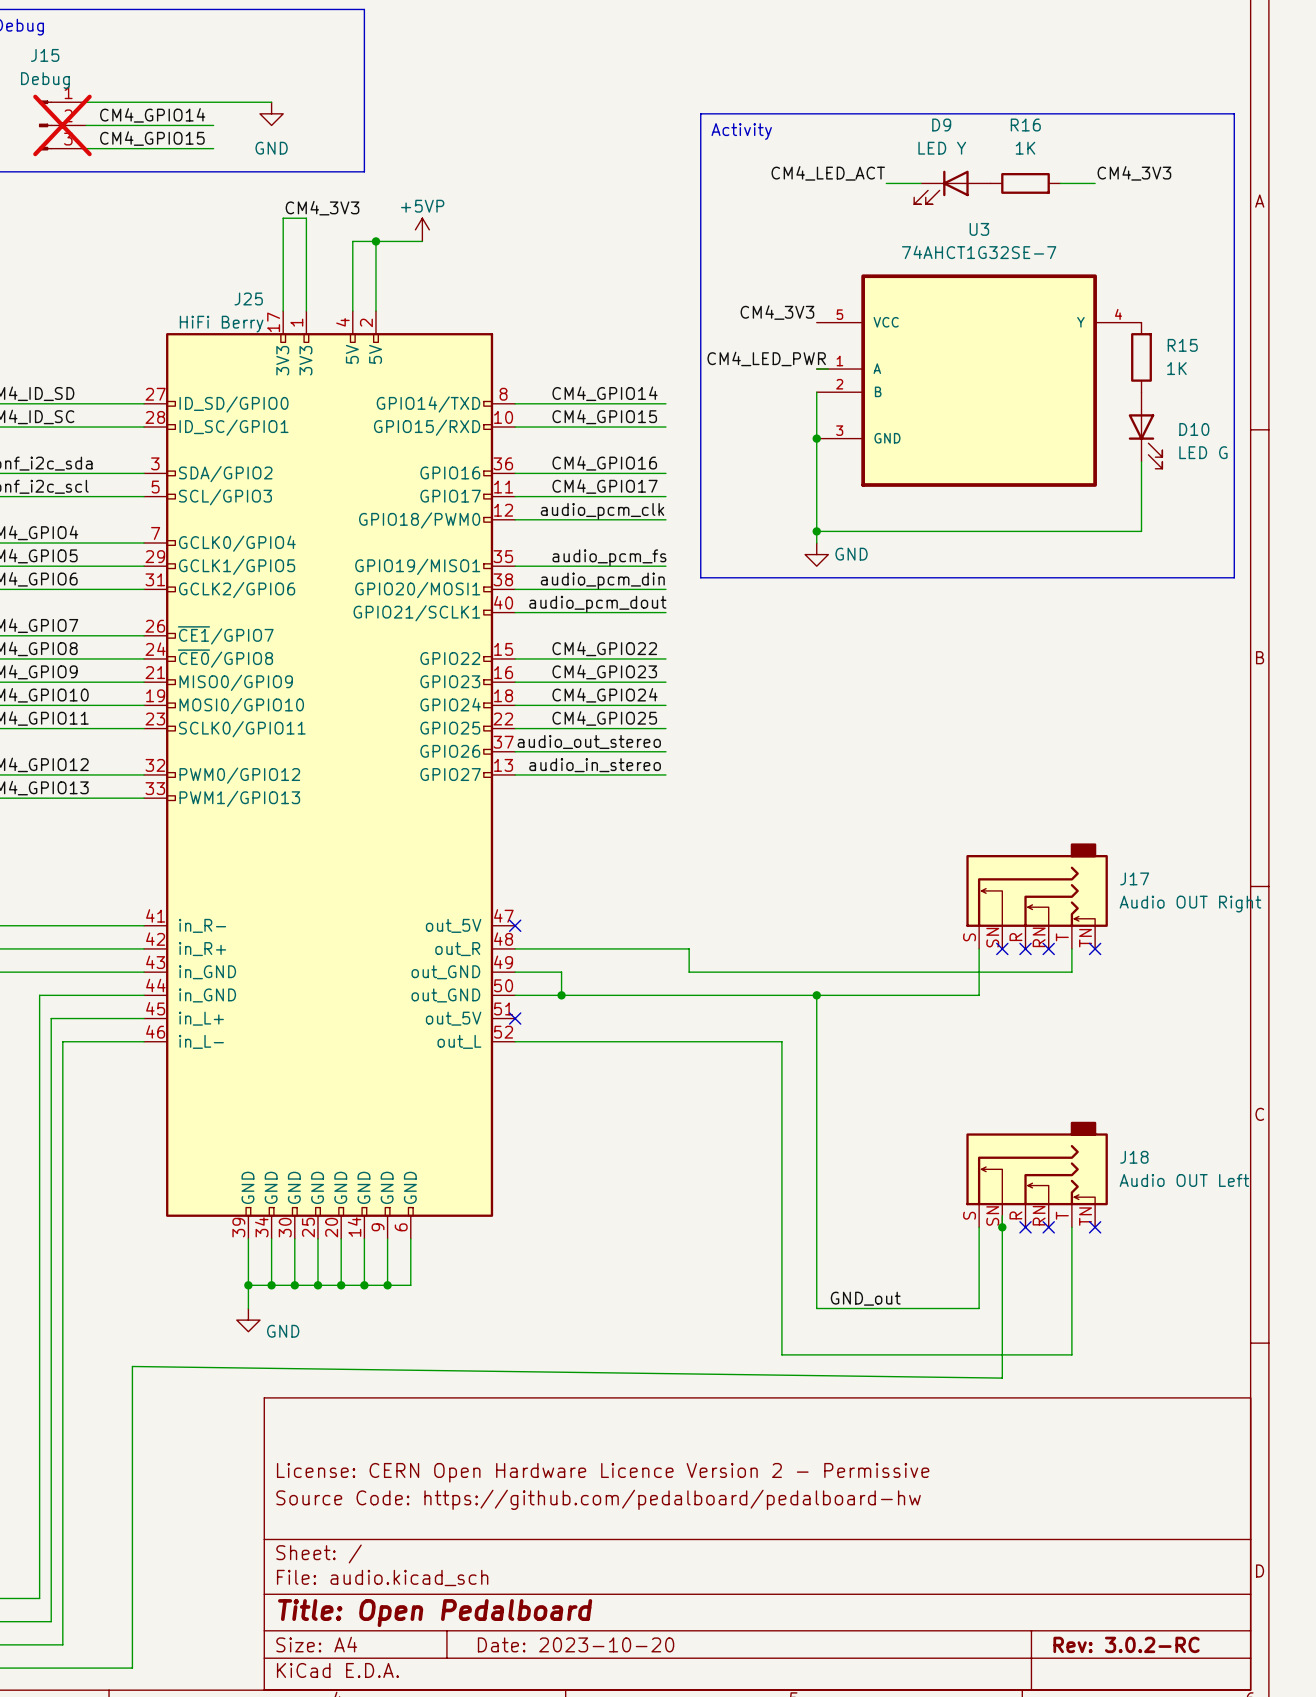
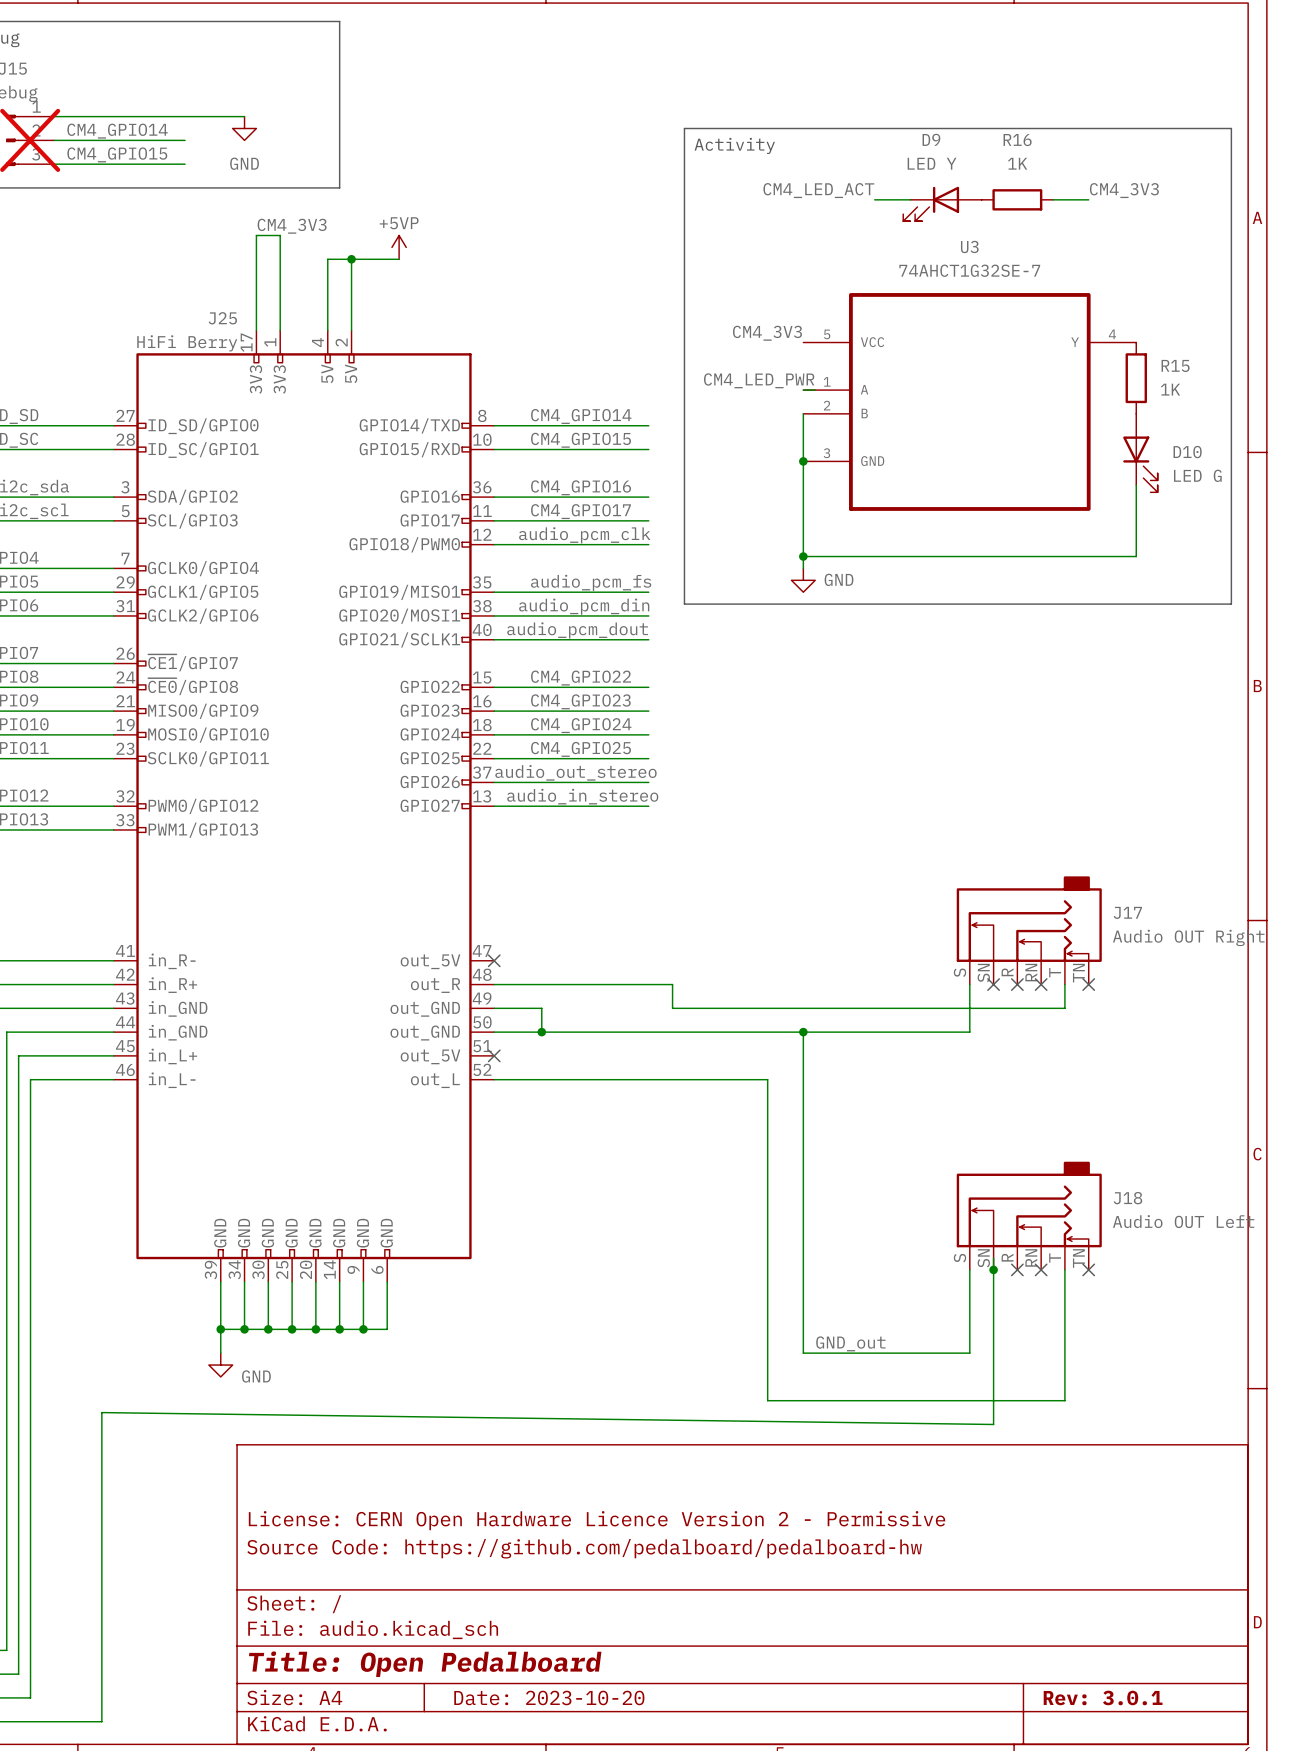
title block: Rev: 3.0.2-RC (1126, 1644) -> Rev: 3.0.1 (1103, 1697)

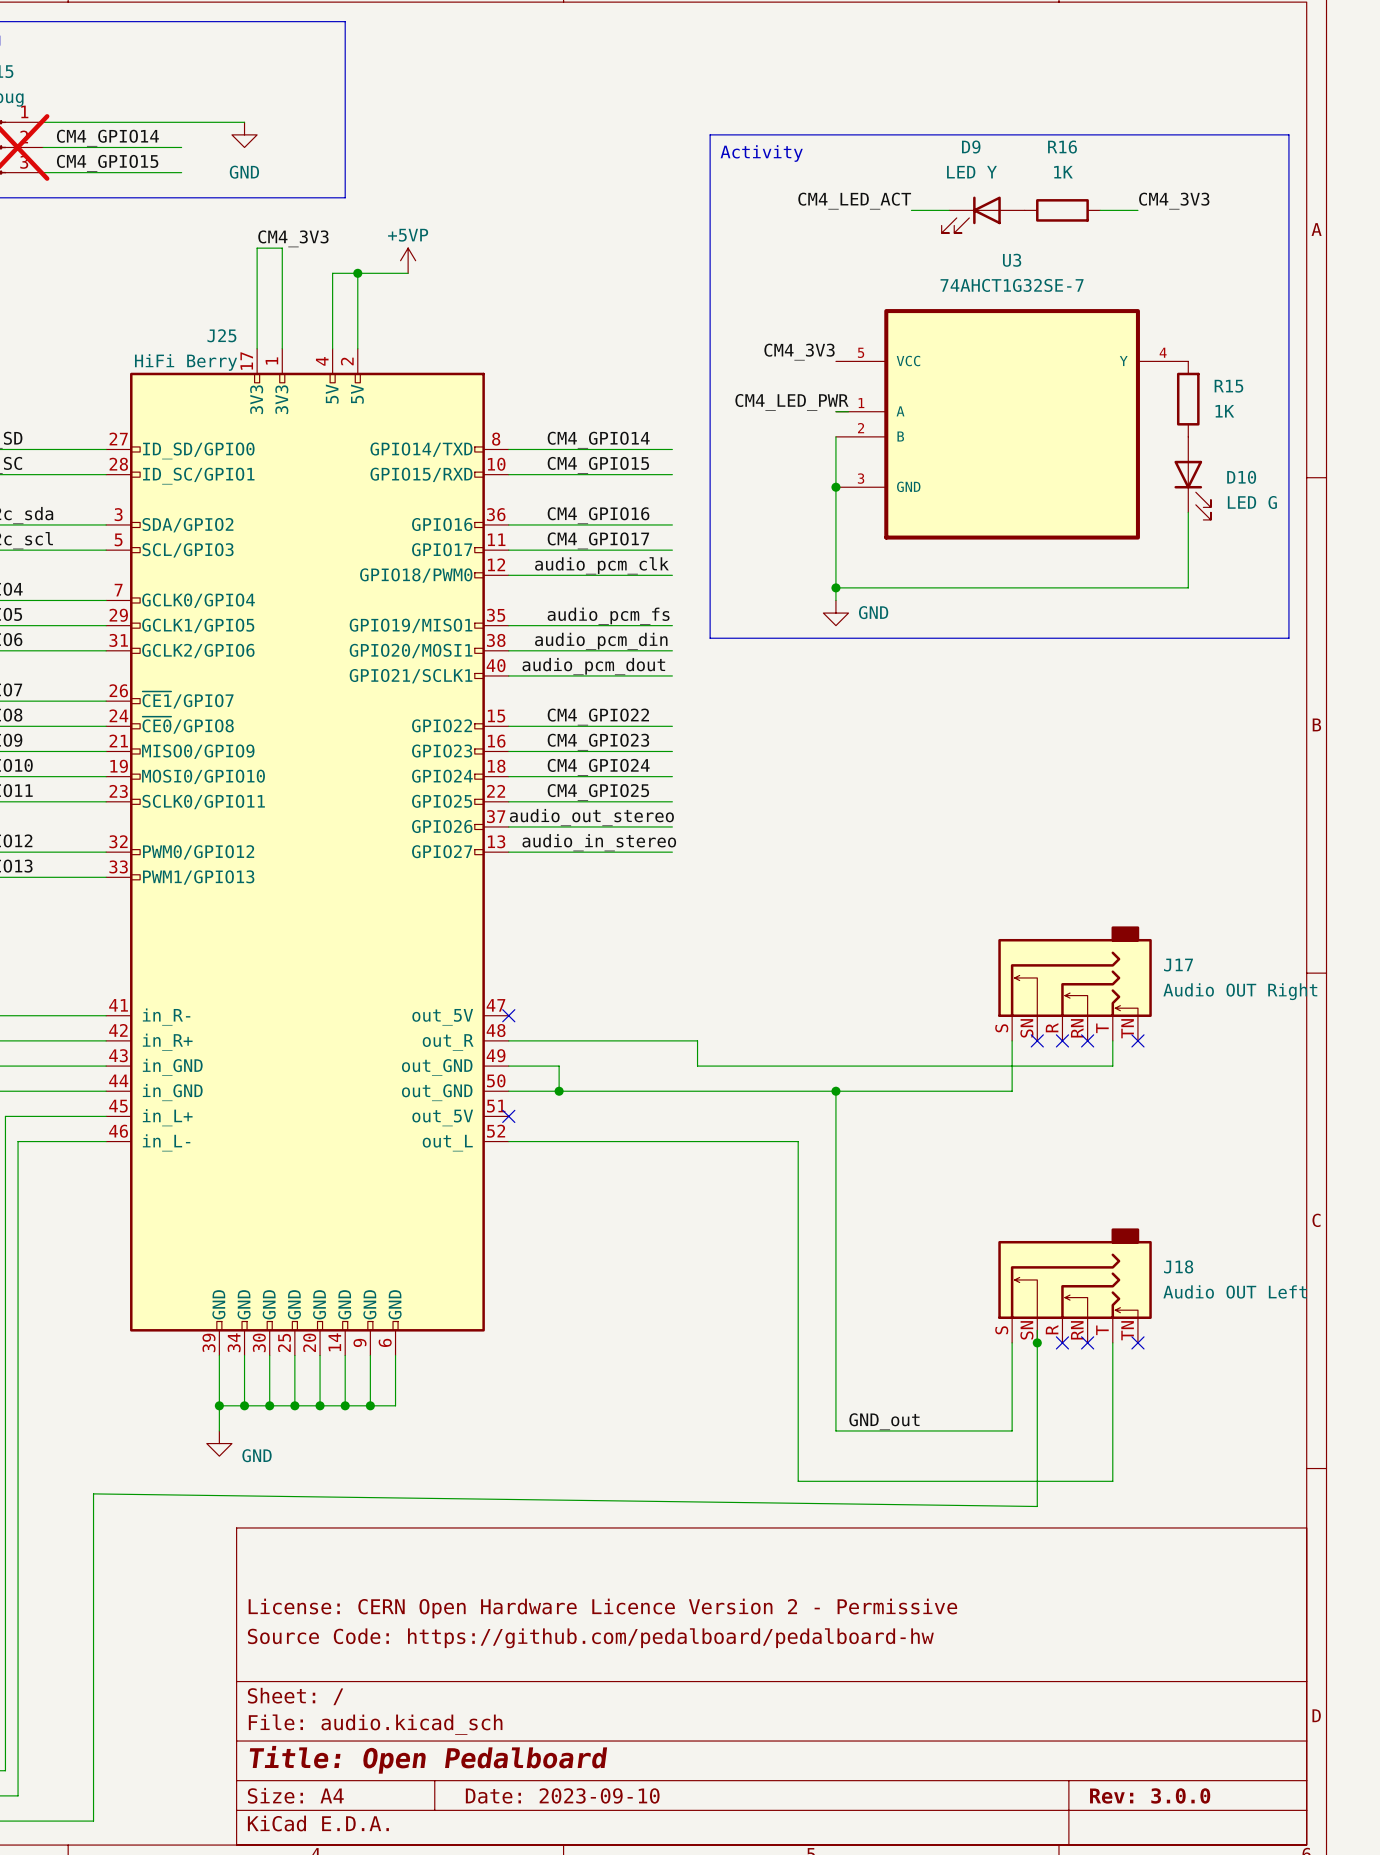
title block: Date: 2023-10-20 (549, 1697) -> Date: 2023-09-10 (562, 1795)
title block: Rev: 3.0.1 (1103, 1697) -> Rev: 3.0.0 (1150, 1795)

